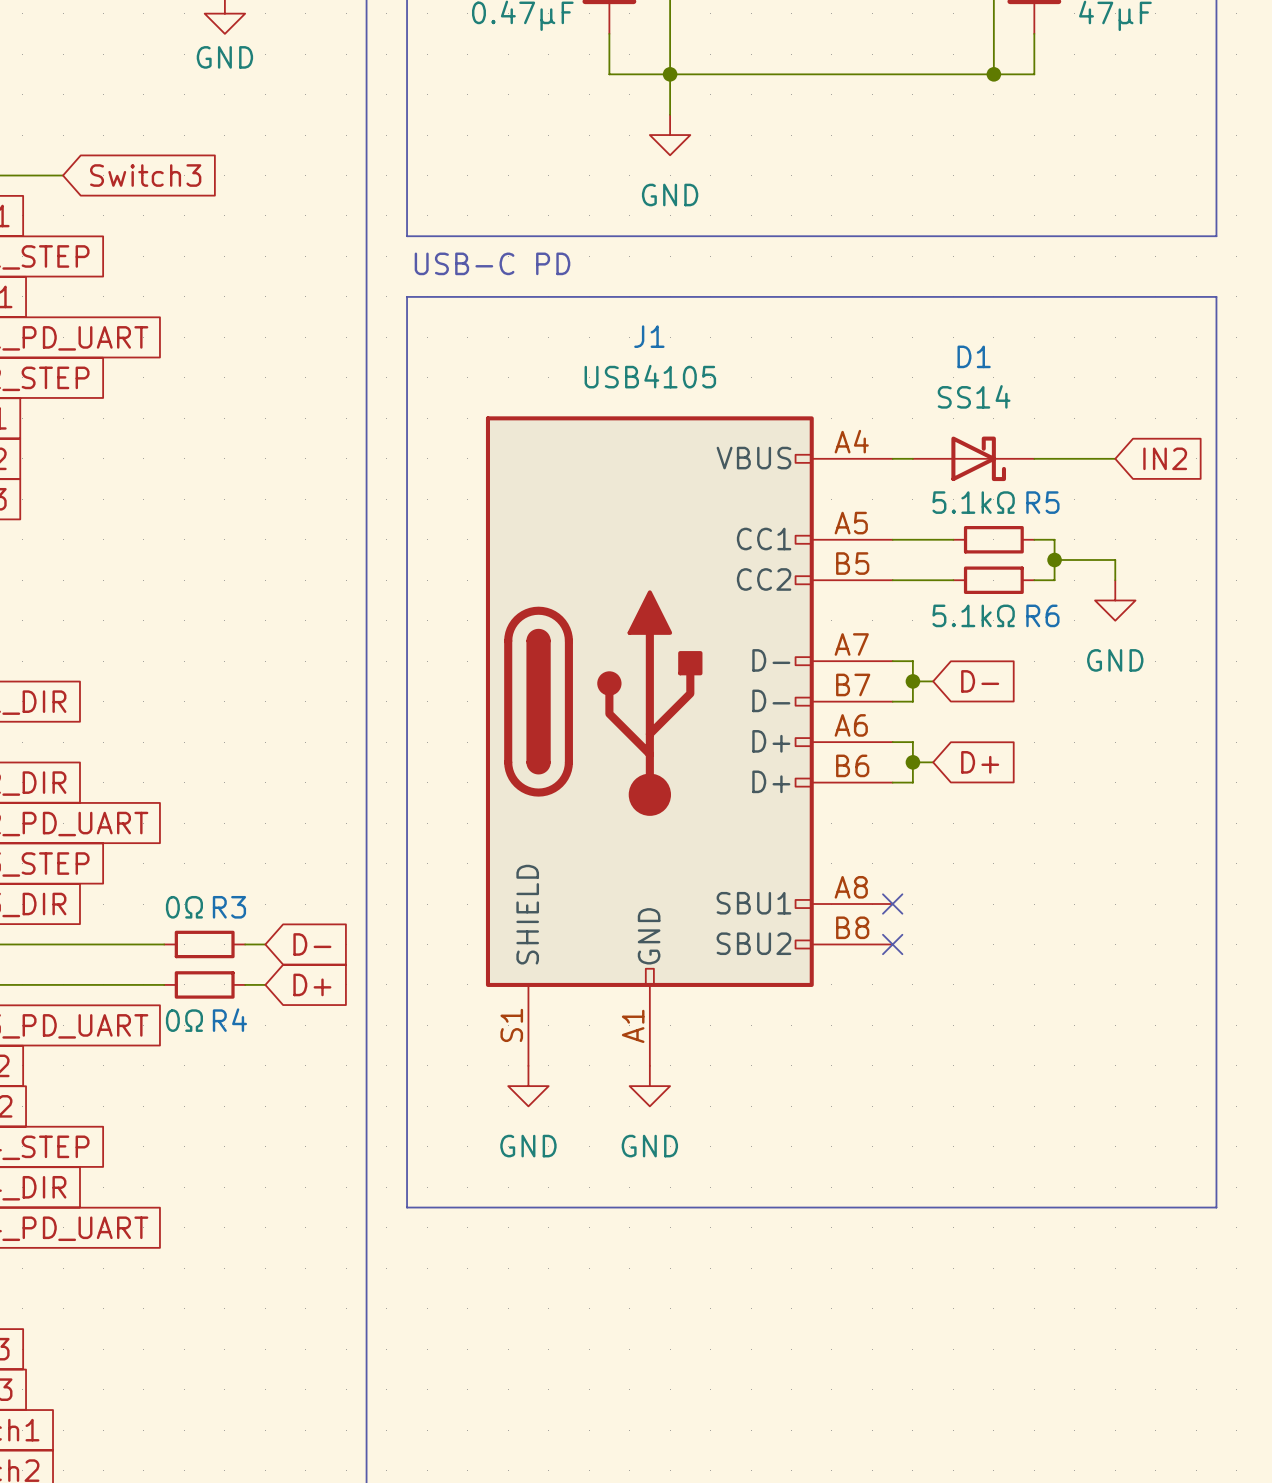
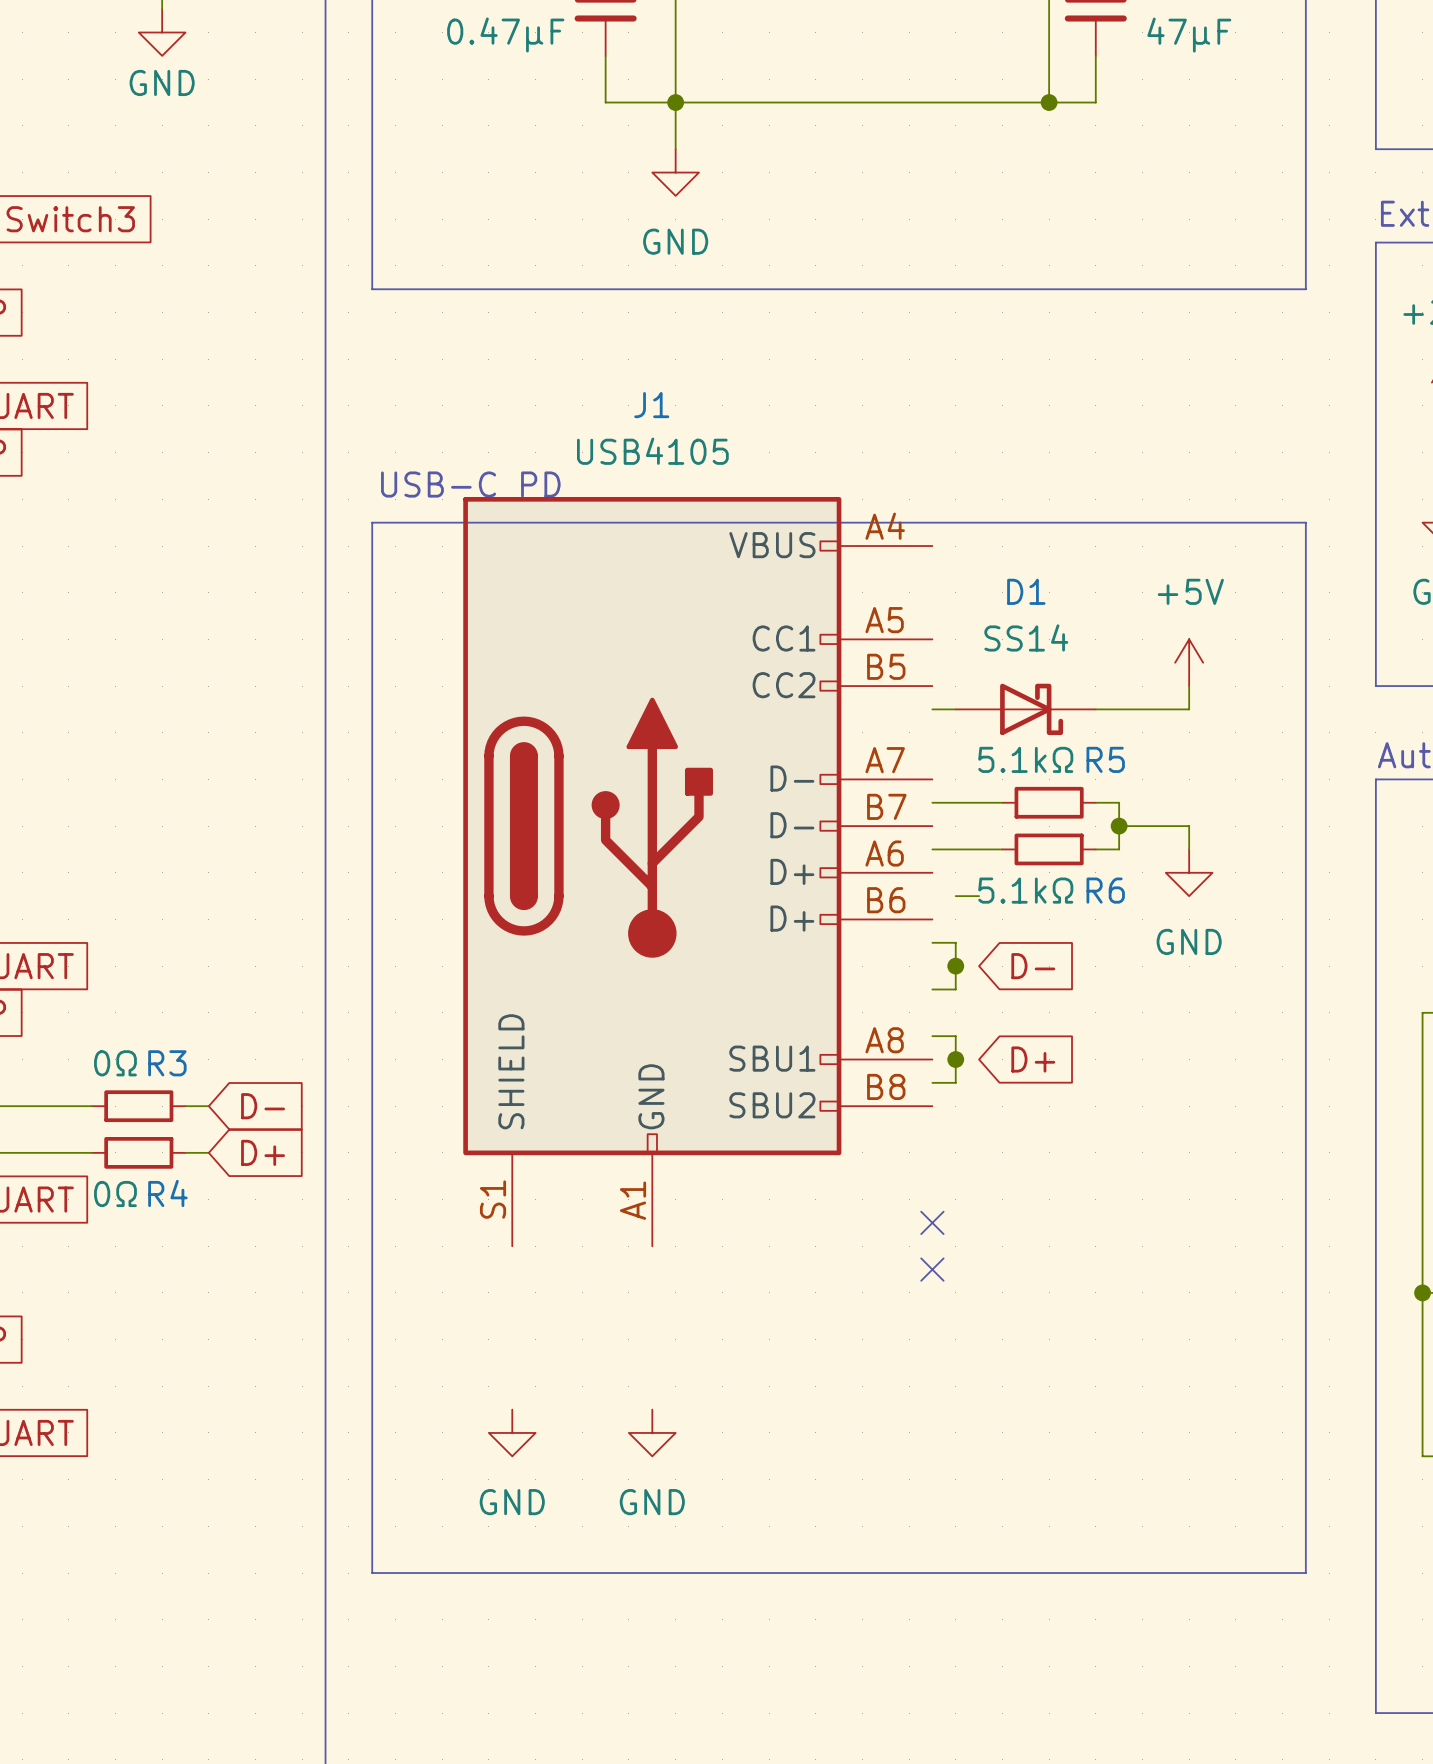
text position: USB-C PD (492, 263) -> USB-C PD (470, 484)
line: (407, 438) (407, 296) (1216, 296) (1216, 438) -> (372, 522) (1305, 522)
wire: (892, 458) (912, 458) -> (932, 709) (955, 709)
D1 position: (973, 458) -> (1025, 709)
wire: (1034, 458) (1115, 458) -> none
global label: IN2 (1165, 458) -> none
wire: (892, 539) (953, 539) -> none
R5 position: (993, 539) -> (1049, 802)
wire: (1034, 539) (1054, 539) (1054, 580) (1034, 580) -> (1095, 802) (1119, 802) (1119, 849) (1095, 849)
wire: (1054, 560) (1115, 560) (1115, 580) -> (1095, 709) (1189, 709) (1189, 686)
junction: (1054, 560) -> none
power symbol: none -> +5V (1189, 662)
wire: (892, 580) (953, 580) -> (932, 849) (1002, 849)
R6 position: (993, 580) -> (1049, 849)
power symbol position: GND (1115, 600) -> GND (1189, 872)
wire: (892, 661) (912, 661) (912, 701) (892, 701) -> (932, 942) (955, 942) (955, 989) (932, 989)
wire: none -> (932, 802) (955, 802)
junction: (912, 681) -> none
wire: none -> (979, 802) (1002, 802)
global label position: D- (980, 681) -> D- (1033, 966)
wire: none -> (1119, 826) (1189, 826) (1189, 849)
junction: none -> (1119, 826)
wire: (892, 742) (912, 742) (912, 782) (892, 782) -> (932, 1036) (955, 1036) (955, 1082) (932, 1082)
junction position: (912, 762) -> (955, 966)
global label position: D+ (980, 762) -> D+ (1033, 1059)
no-connect mark: (892, 904) -> none
junction: none -> (955, 1059)
no-connect mark: (892, 944) -> none
no-connect mark: none -> (932, 1222)
power symbol: GND (528, 1086) -> none
power symbol: GND (649, 1086) -> none
no-connect mark: none -> (932, 1269)
line: (407, 1207) (1216, 1207) -> (372, 1409) (372, 1573) (1305, 1573) (1305, 1409)
power symbol: none -> GND (512, 1432)
power symbol: none -> GND (652, 1432)

